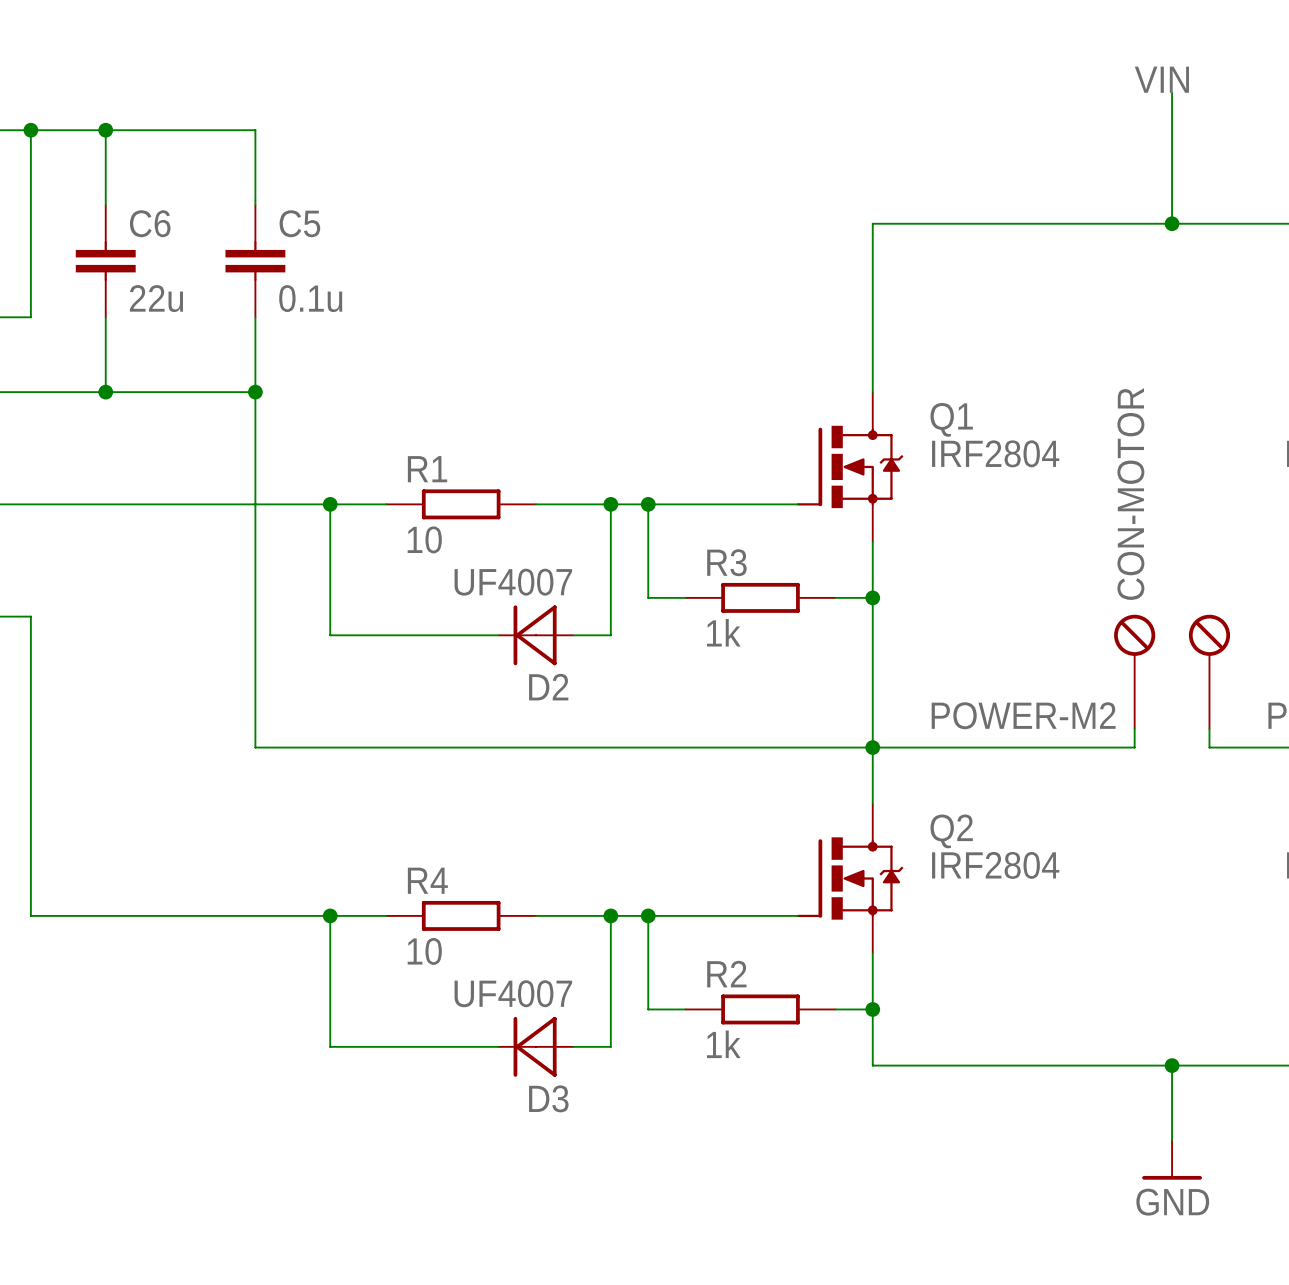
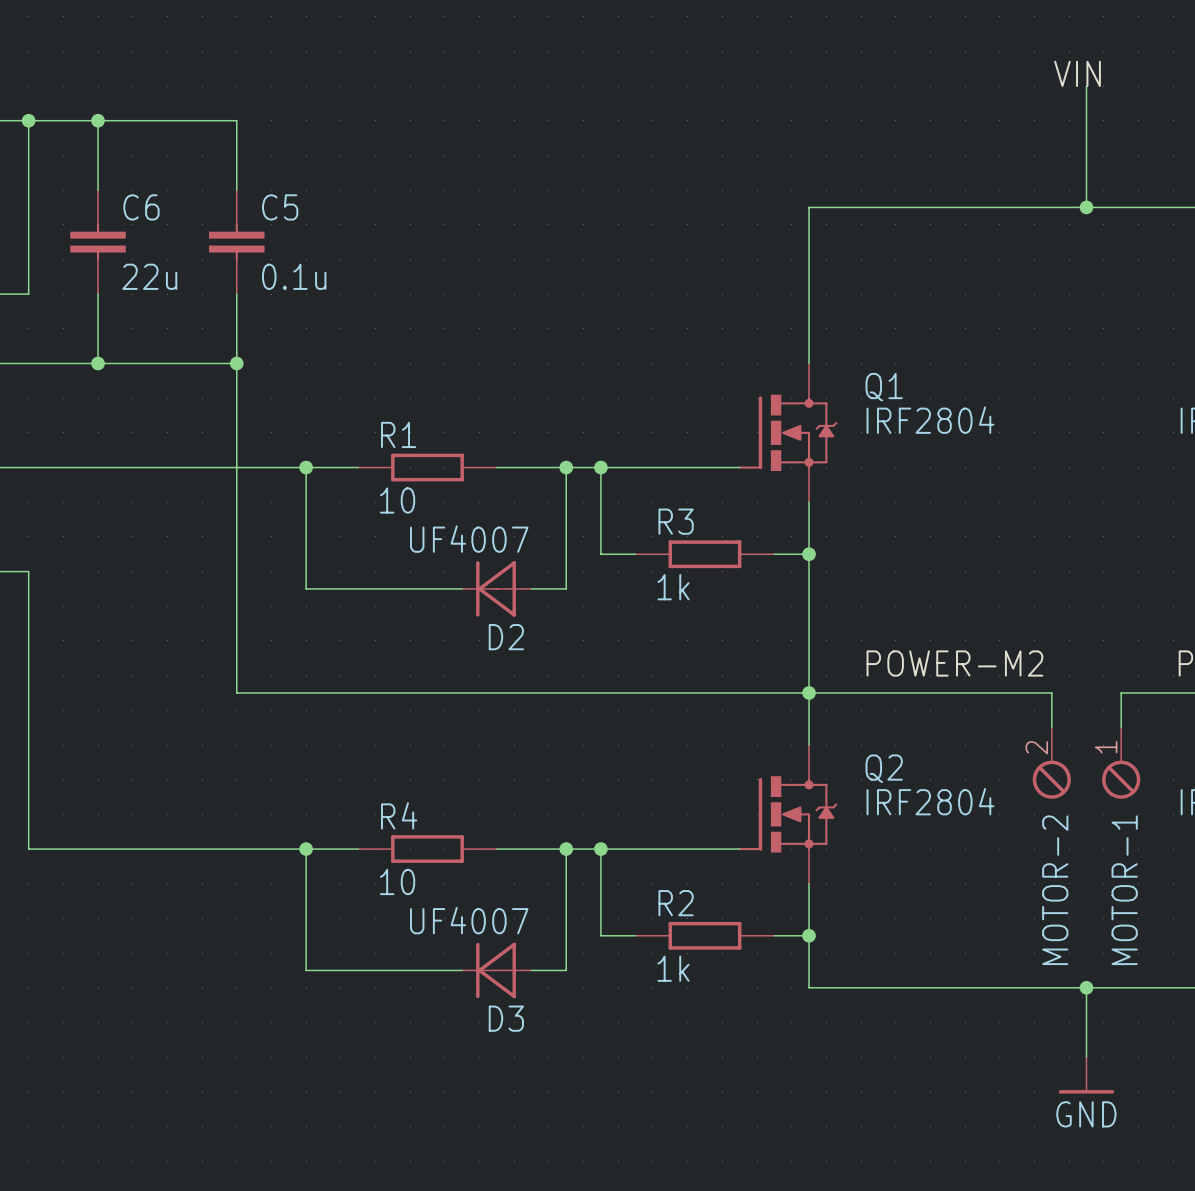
CON-MOTOR: (1172, 671) -> none
wire: (1134, 728) (1134, 747) -> (1051, 727) (1051, 692)
wire: (1209, 728) (1209, 747) -> (1121, 727) (1121, 692)
MOTOR-2: none -> (1051, 763)
MOTOR-1: none -> (1121, 763)

